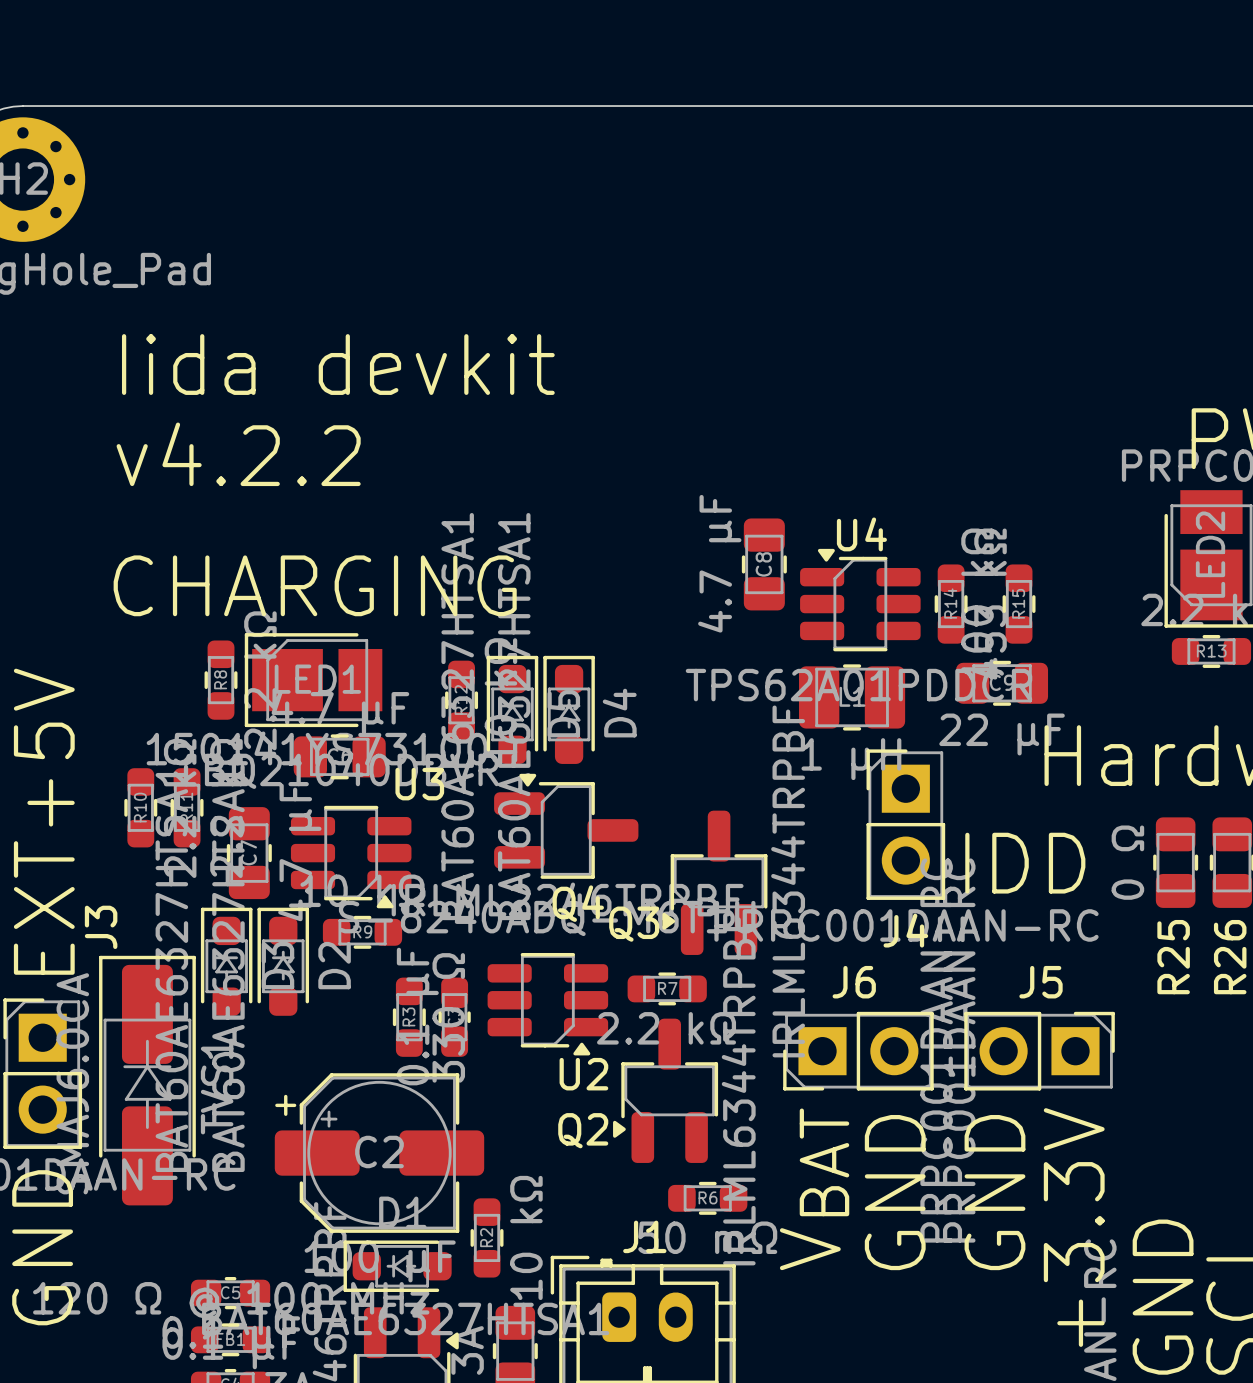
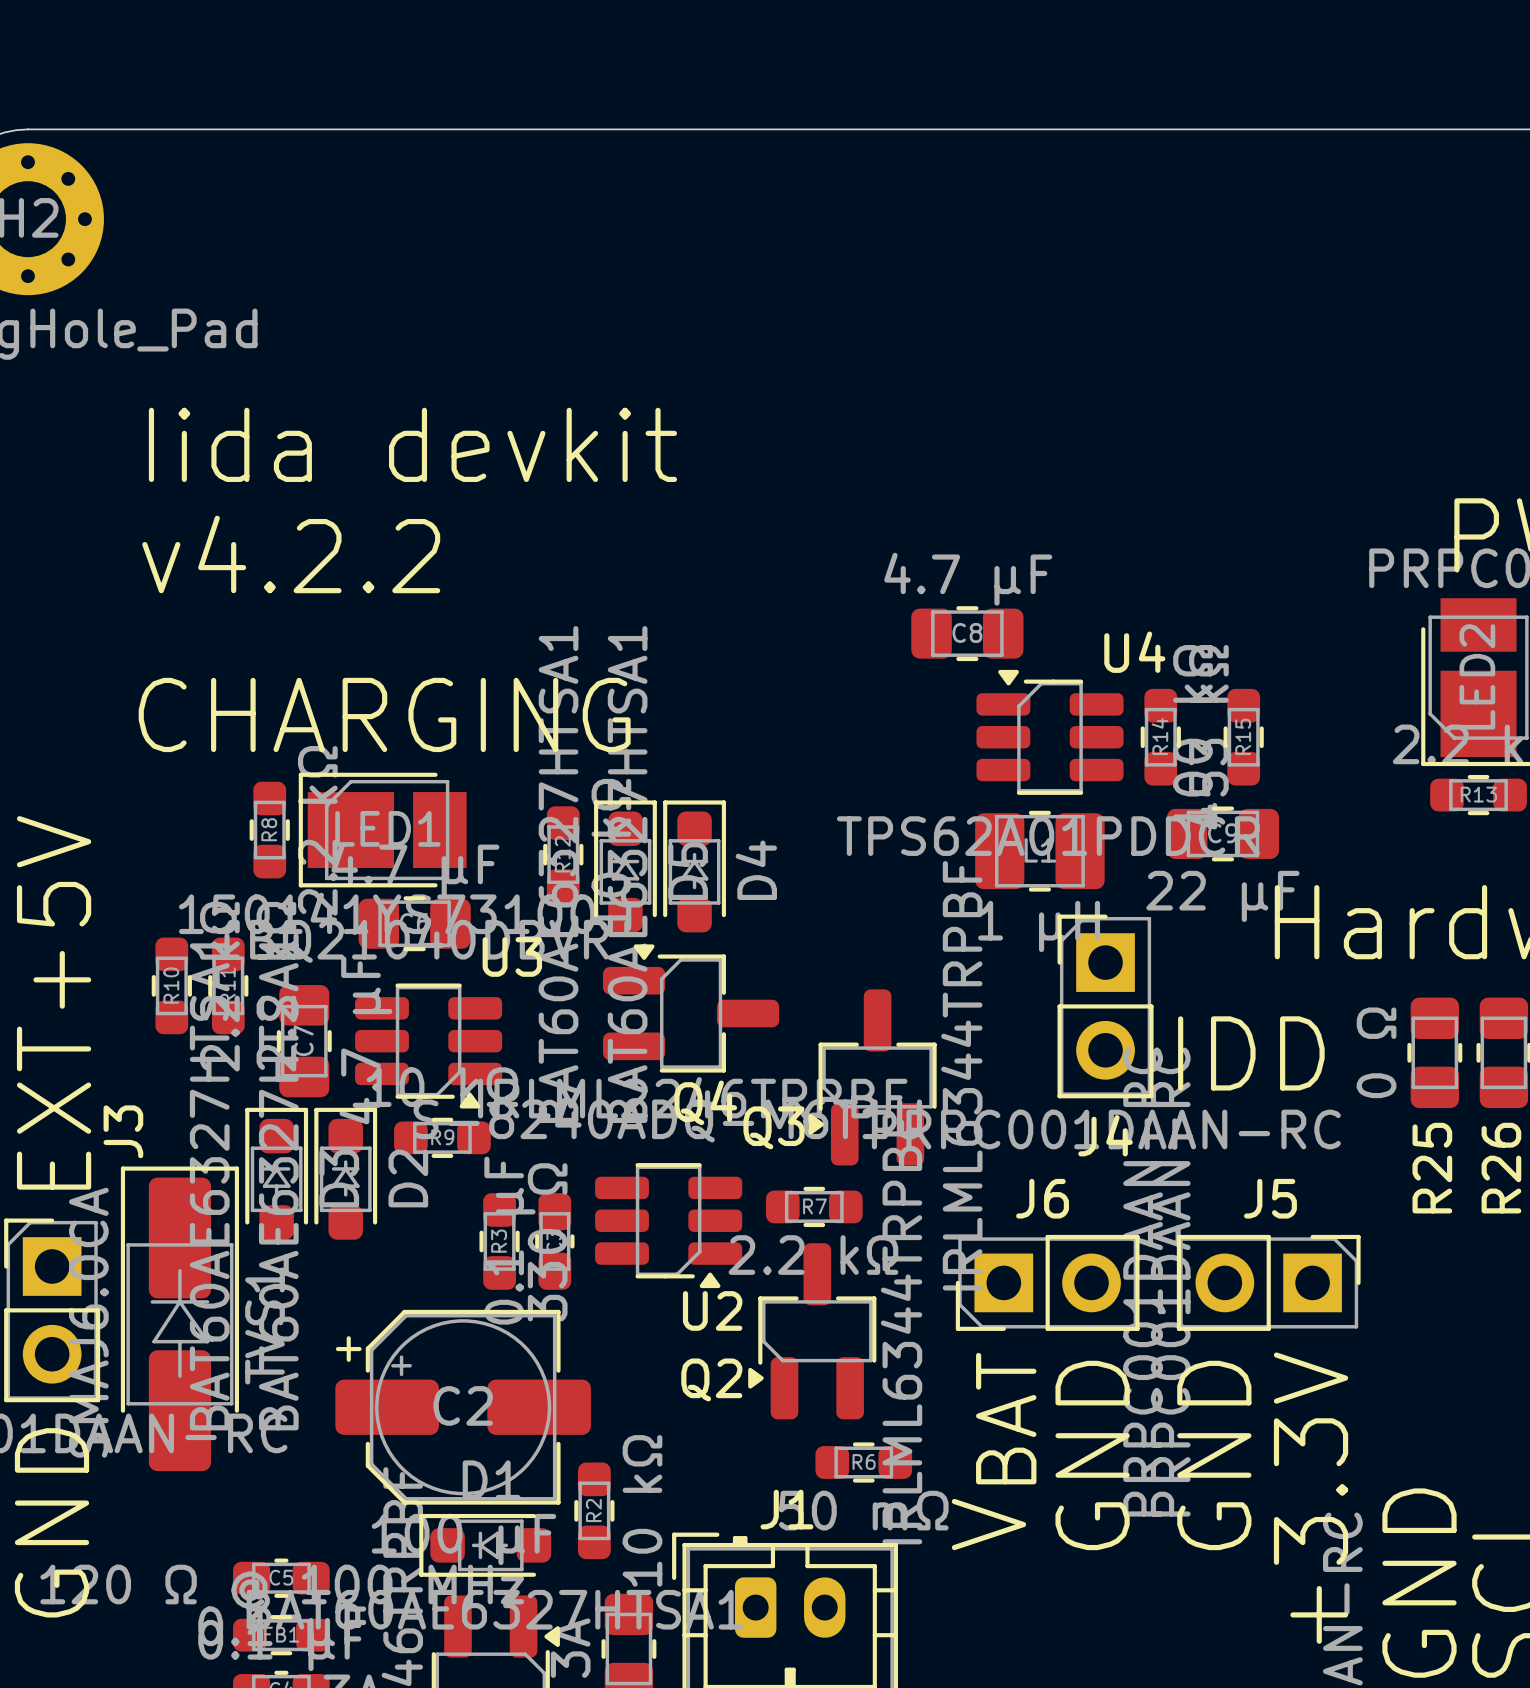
U4 name position: U4 (861, 534) -> U4 (1134, 652)
C8 rotation: 0° (764, 564) -> 90° clockwise (967, 633)

